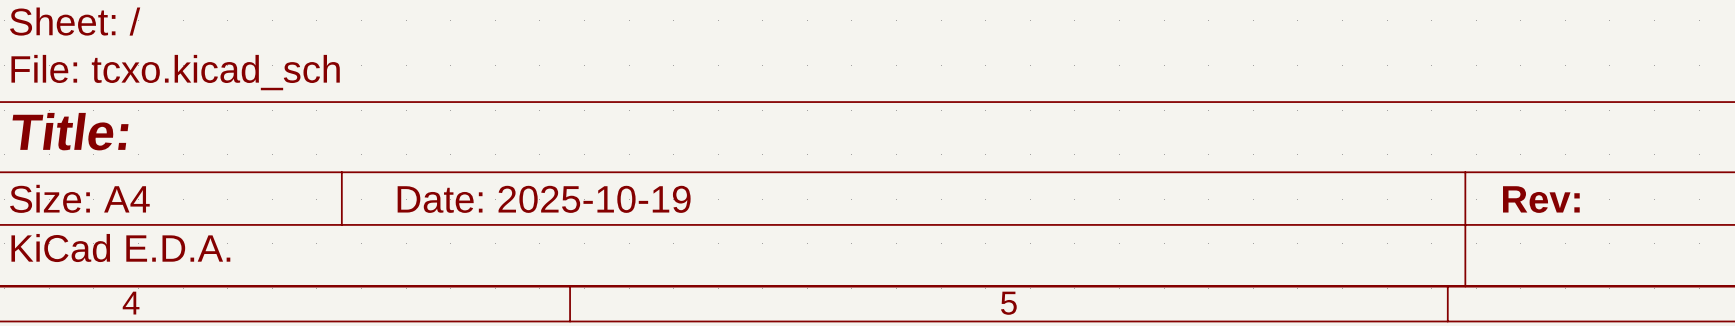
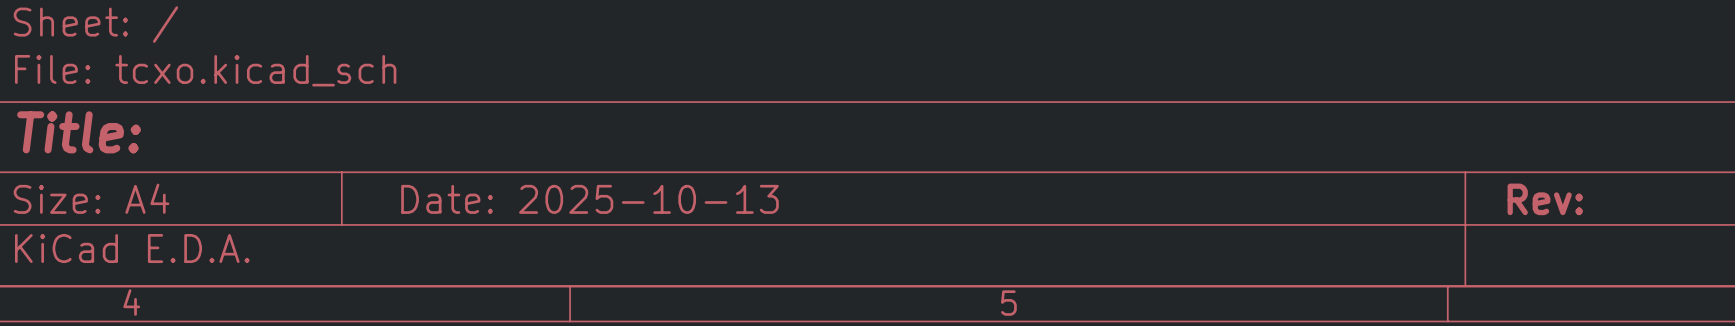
title block: Date: 2025-10-19 (544, 199) -> Date: 2025-10-13 (589, 199)

